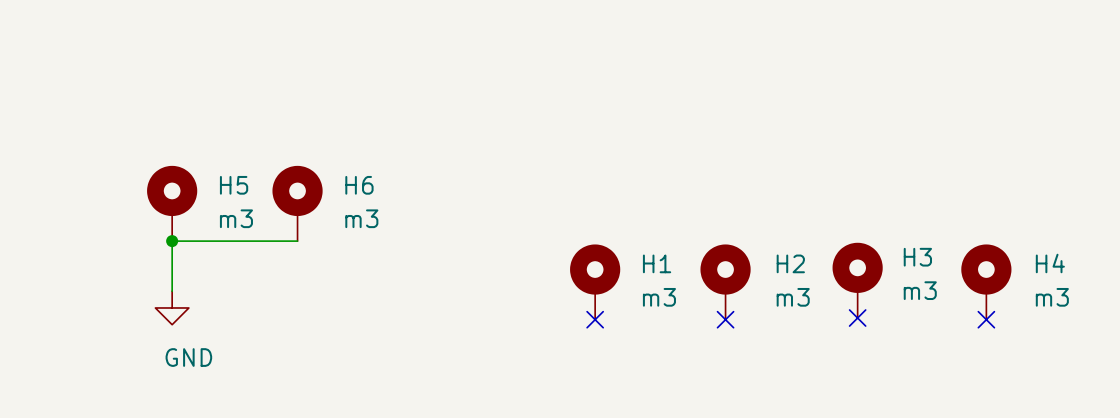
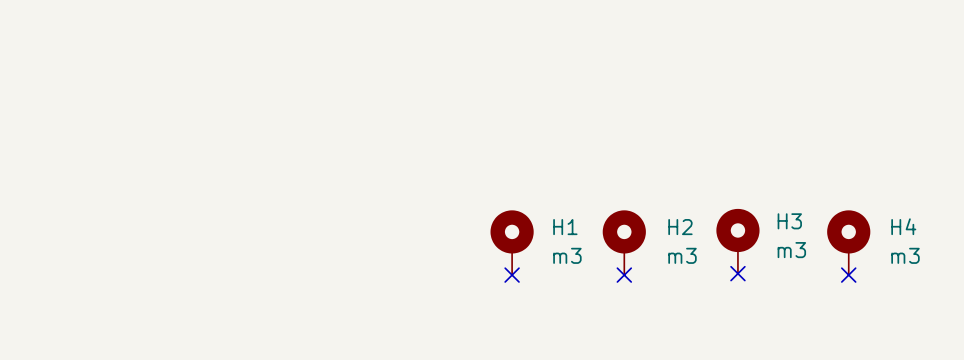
H5: m3 (172, 203) -> none
H6: m3 (297, 203) -> none
junction: (172, 241) -> none
wire: (297, 241) (172, 241) (172, 291) -> none
power symbol: GND (172, 307) -> none

